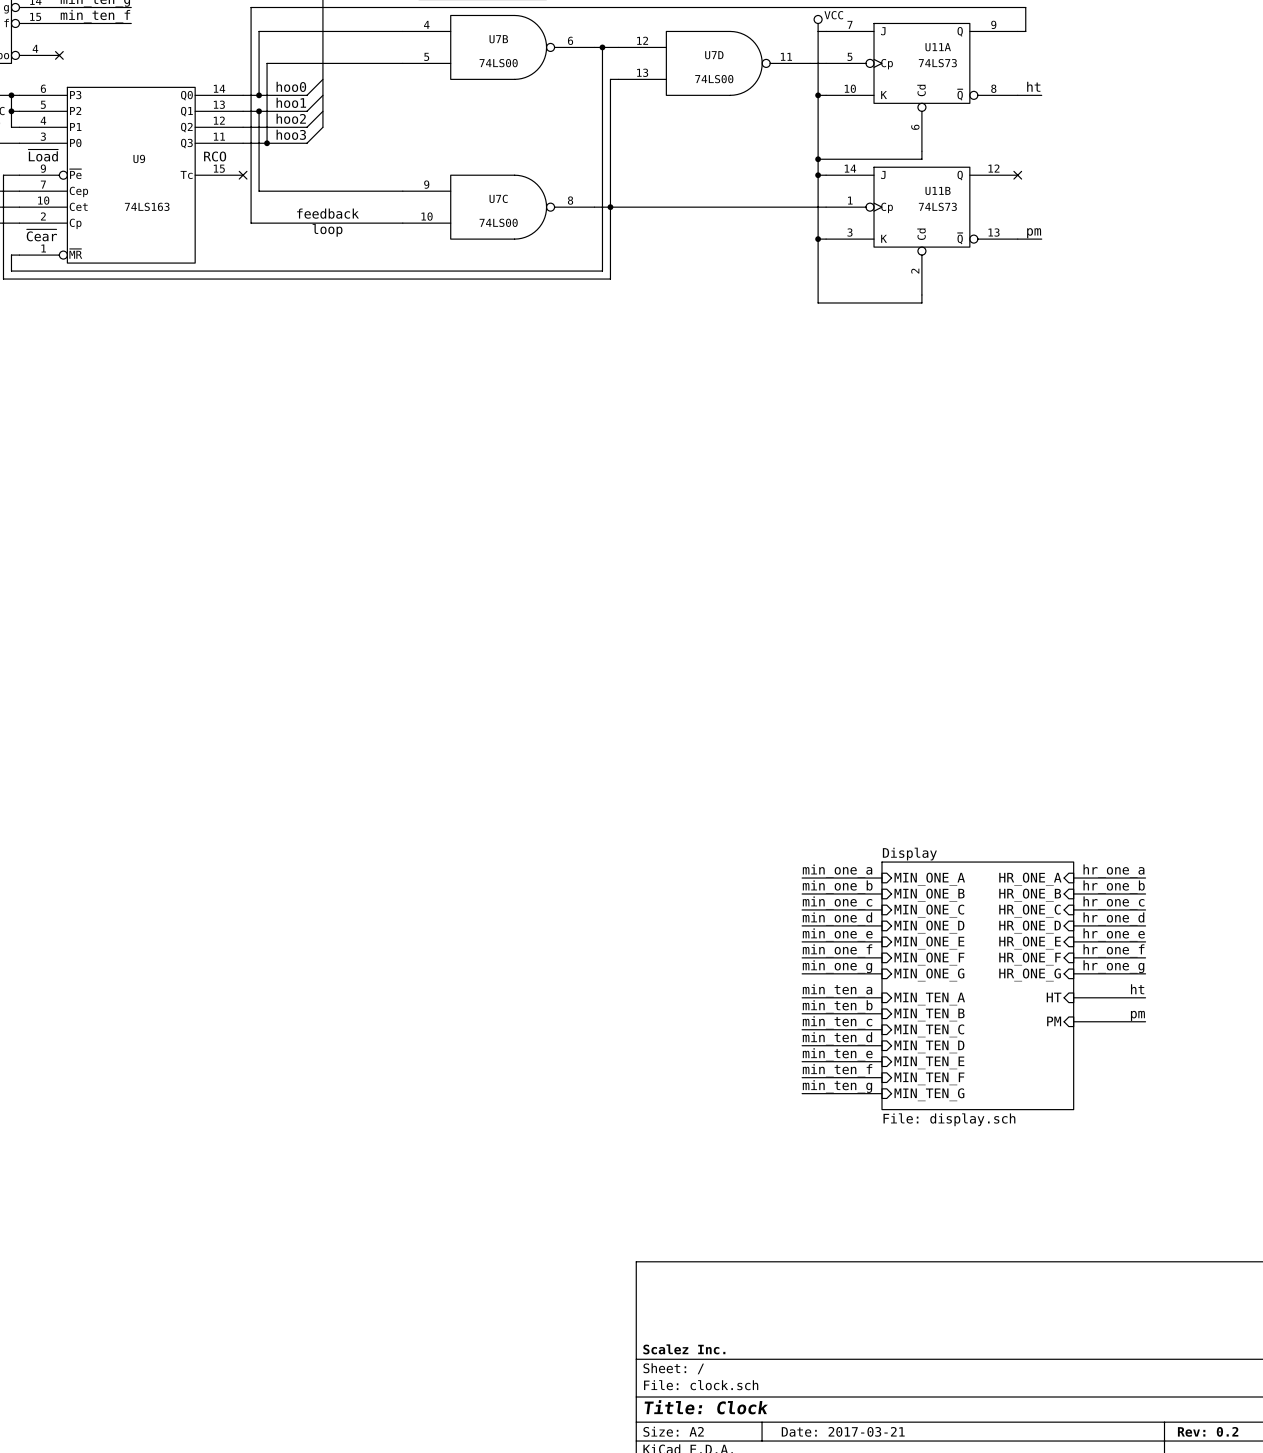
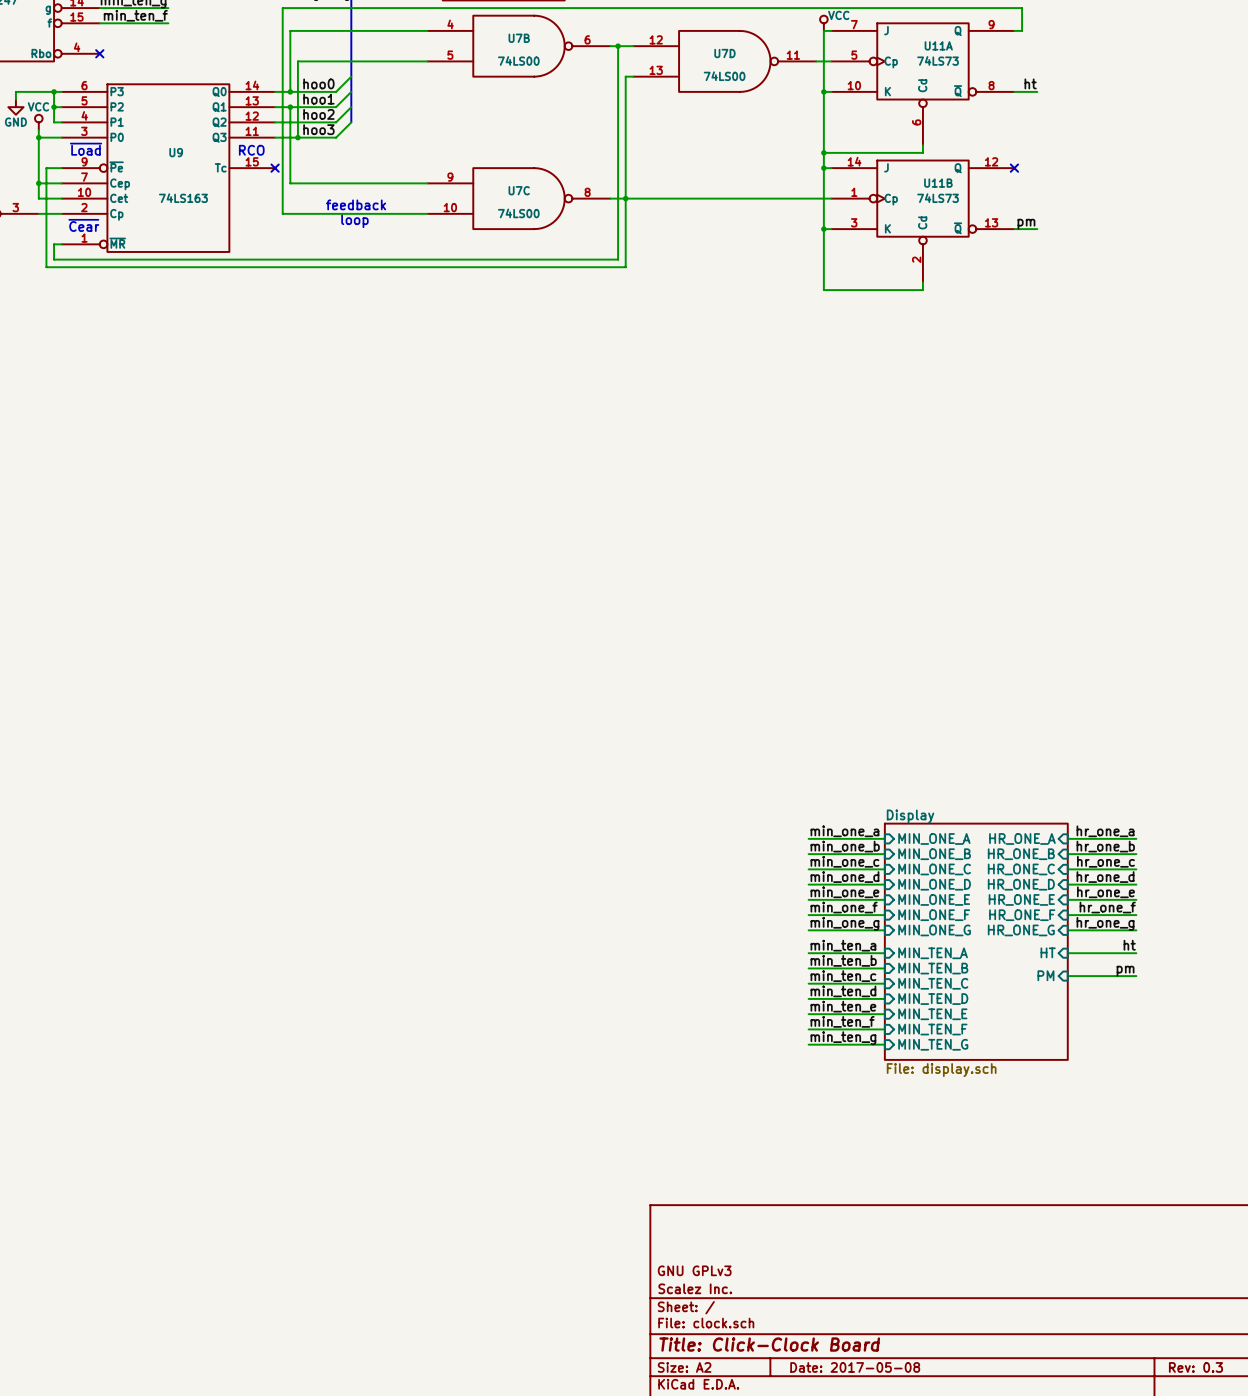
title block: none -> GNU GPLv3 (694, 1270)
title block: Title: Clock (706, 1407) -> Title: Click-Clock Board (769, 1344)
title block: Date: 2017-03-21 (843, 1431) -> Date: 2017-05-08 (855, 1367)
title block: Rev: 0.2 (1208, 1431) -> Rev: 0.3 (1195, 1367)

